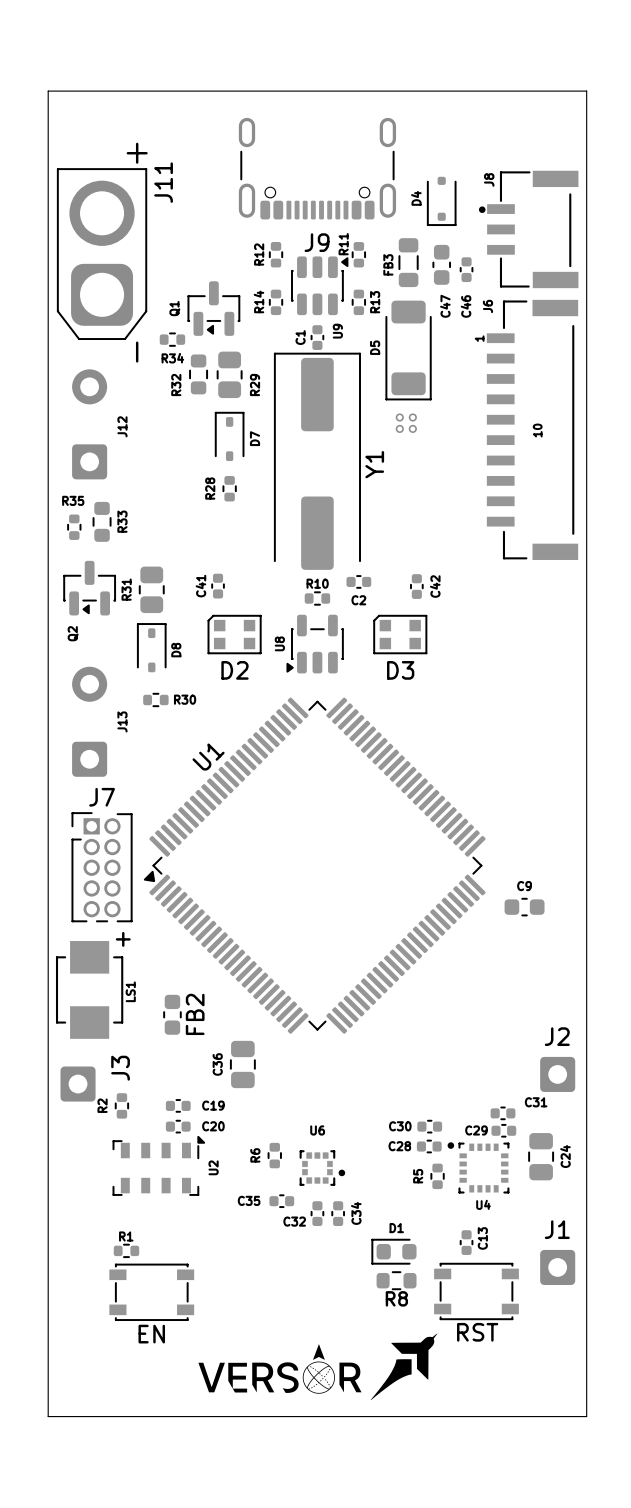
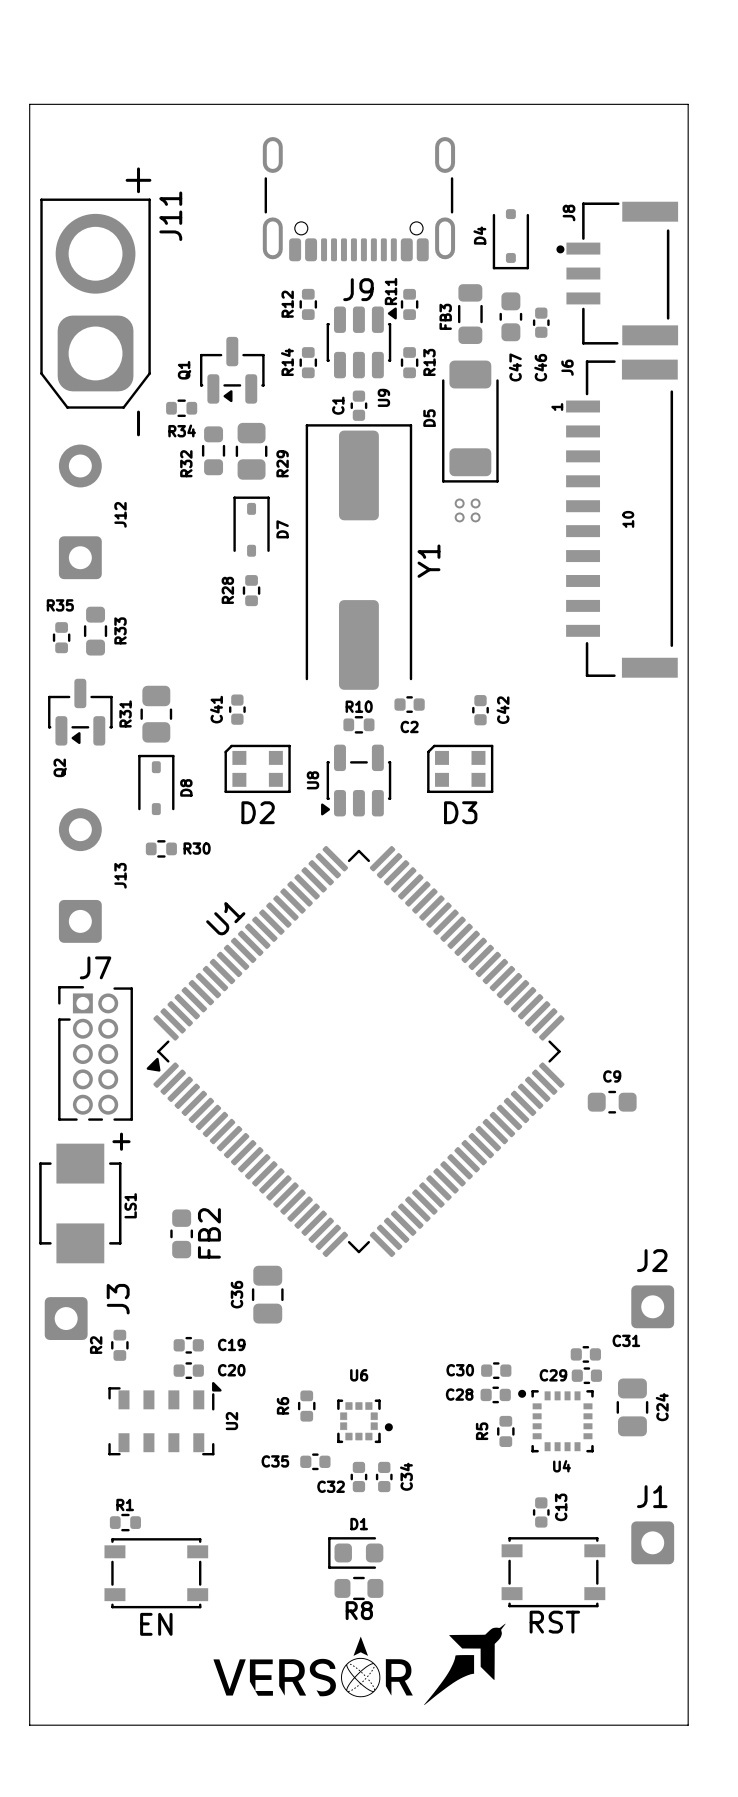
D1 position: (393, 1251) -> (355, 1552)
R8 position: (396, 1280) -> (358, 1588)

